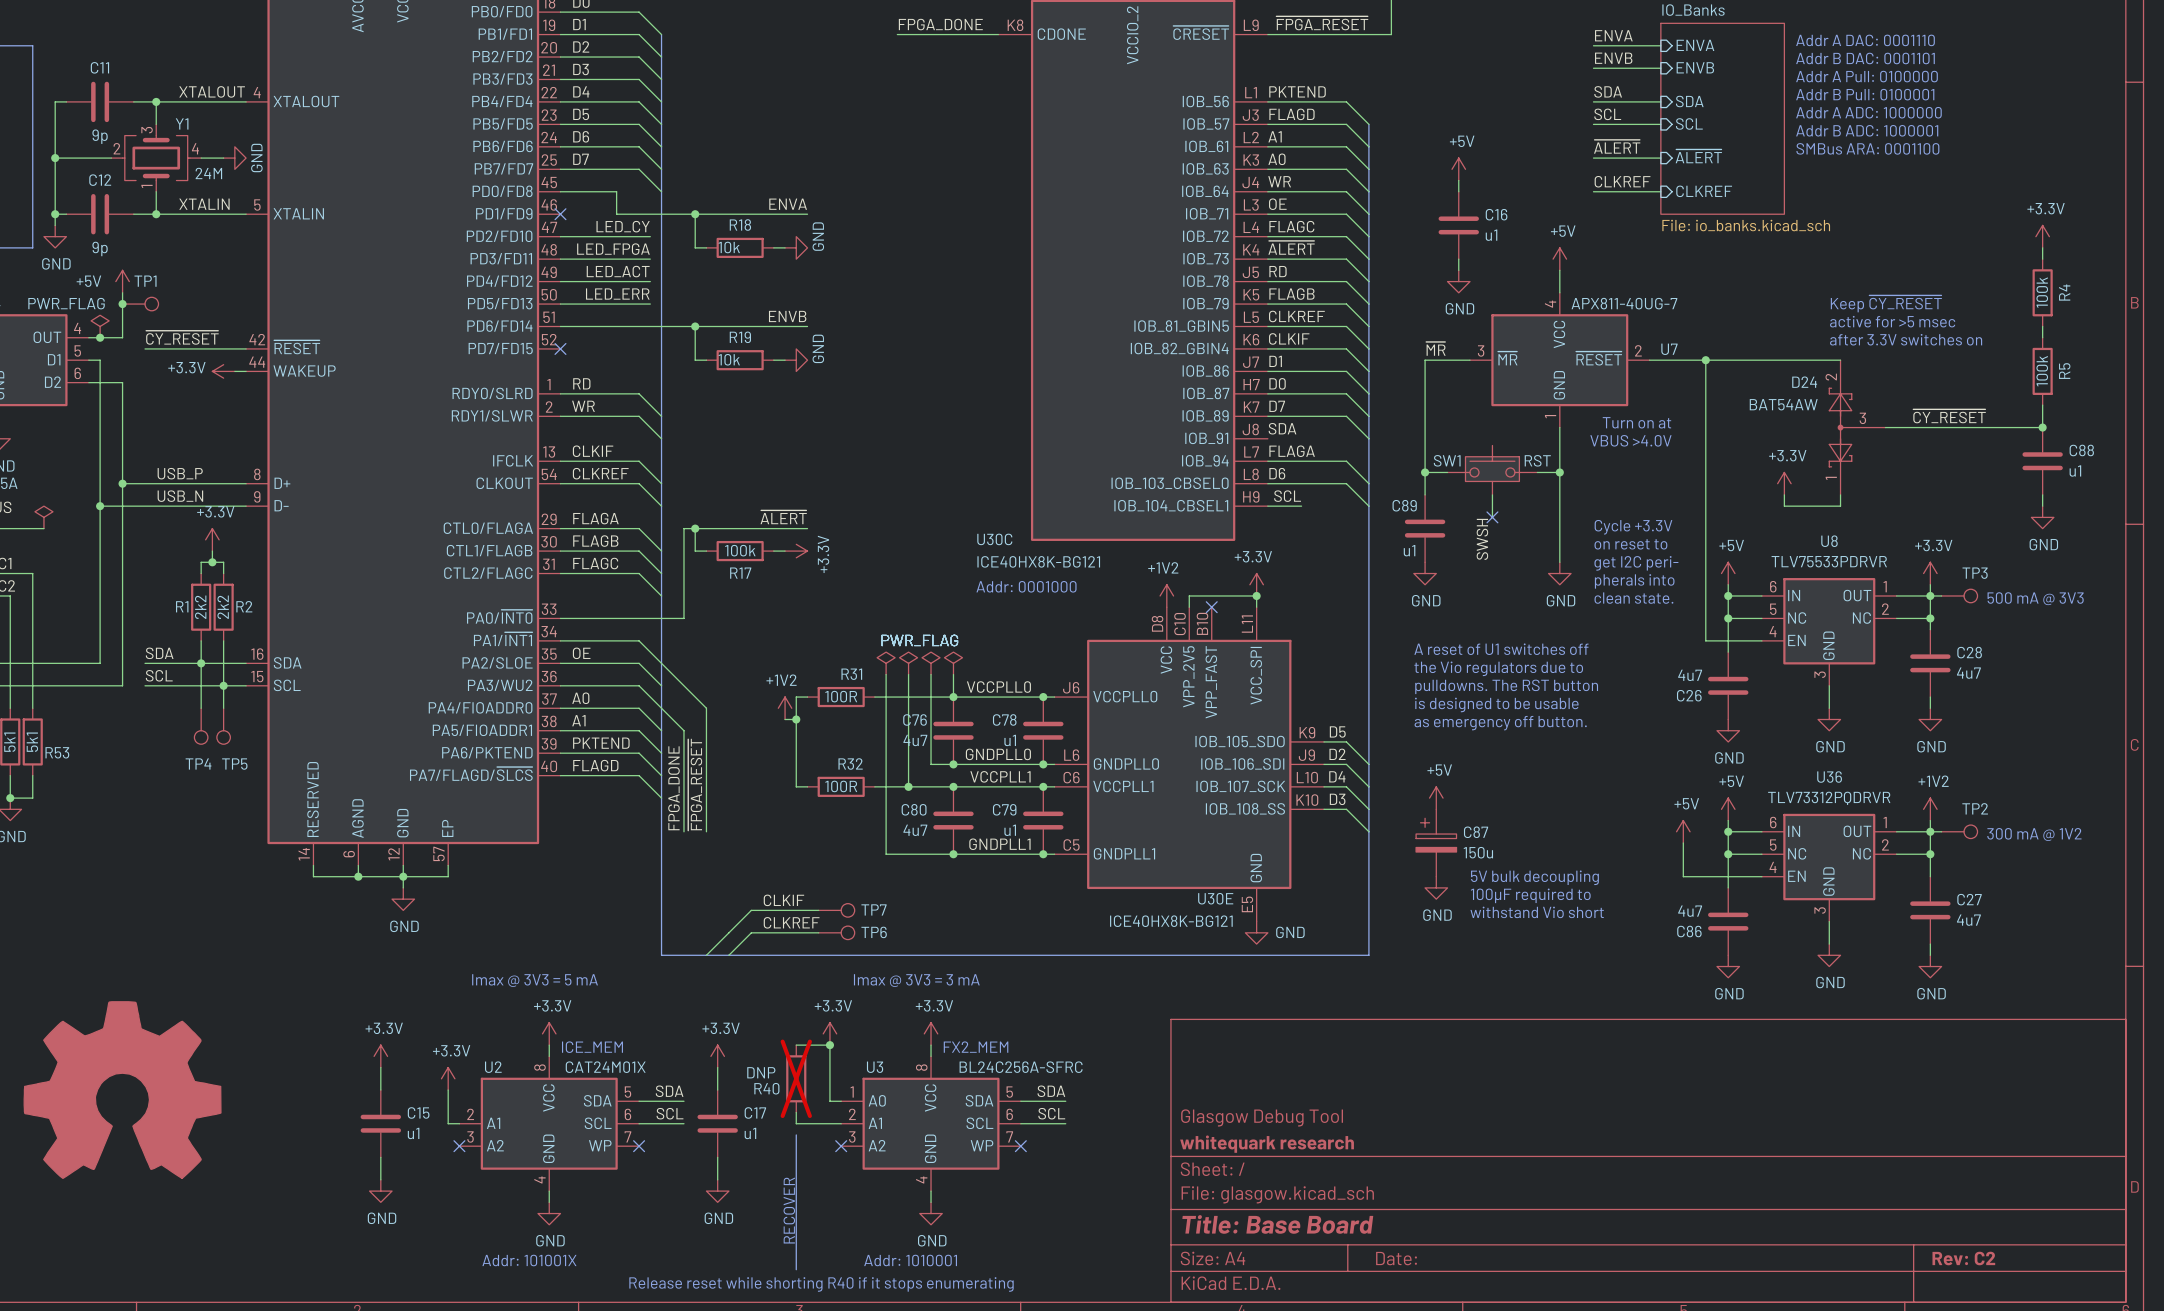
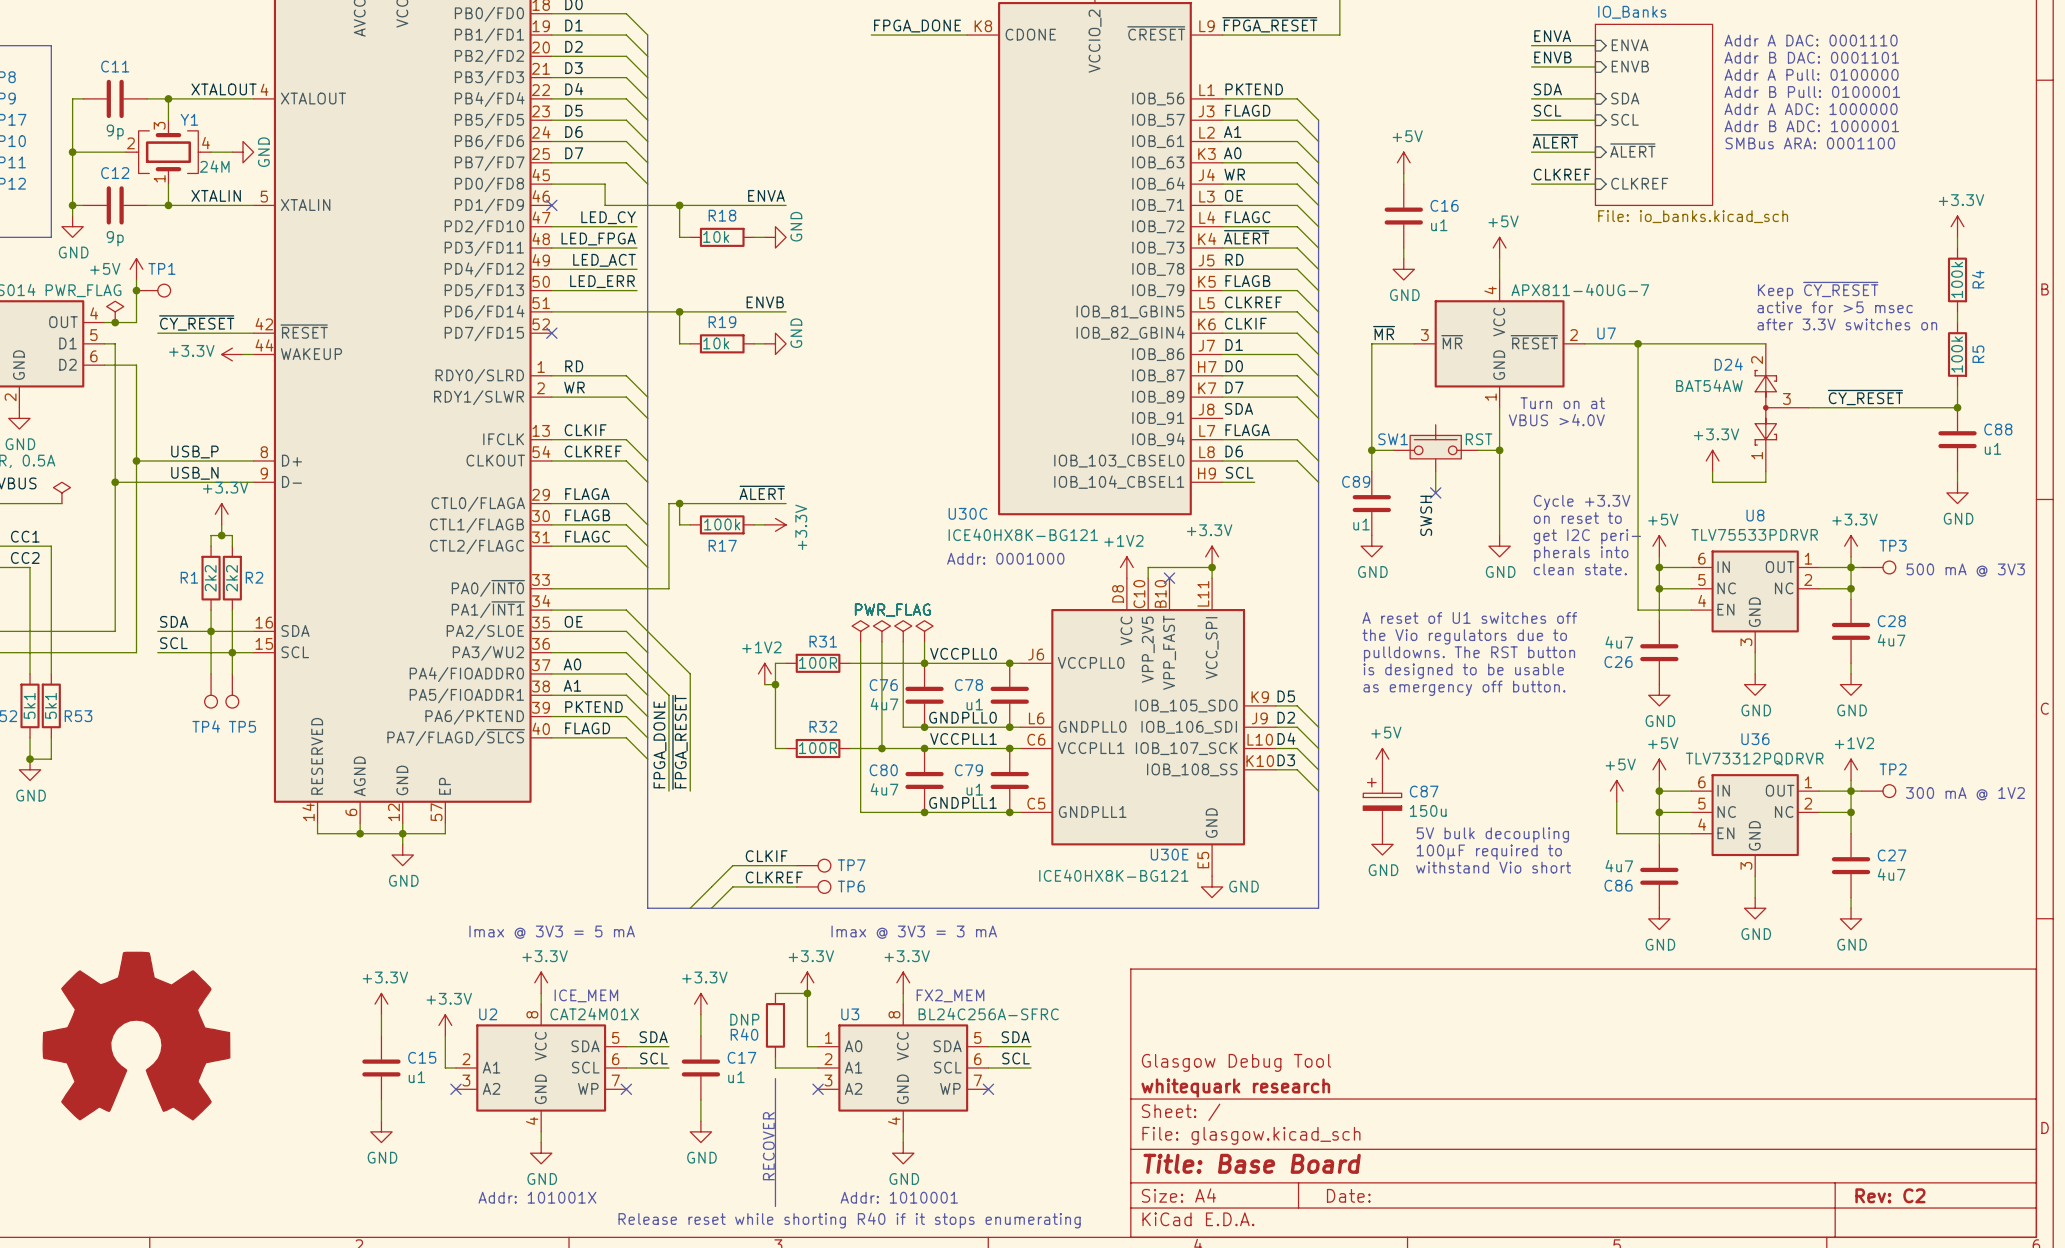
R40 do-not-place cross: (796, 1078) -> none

